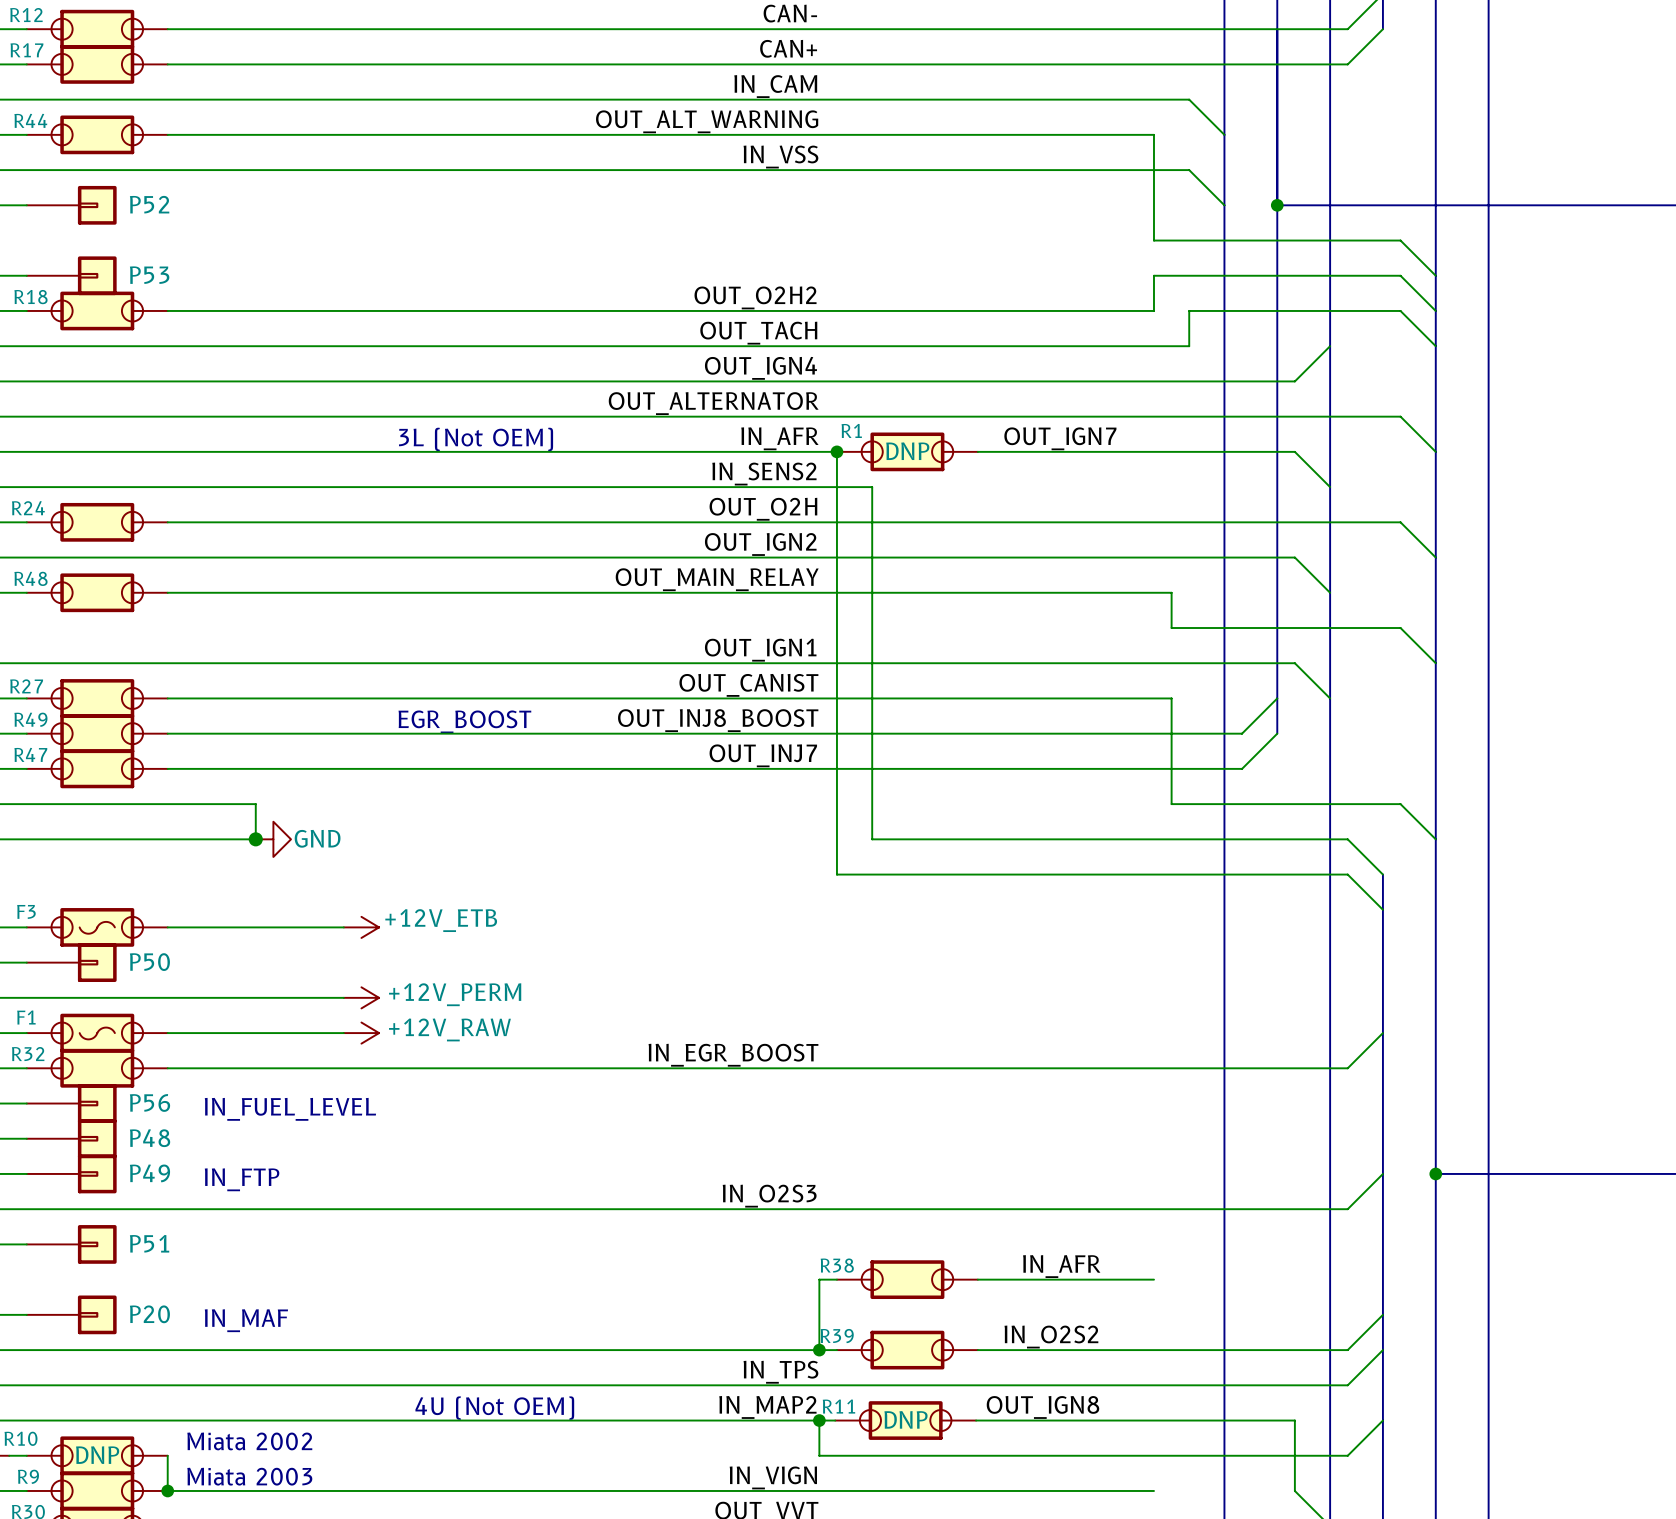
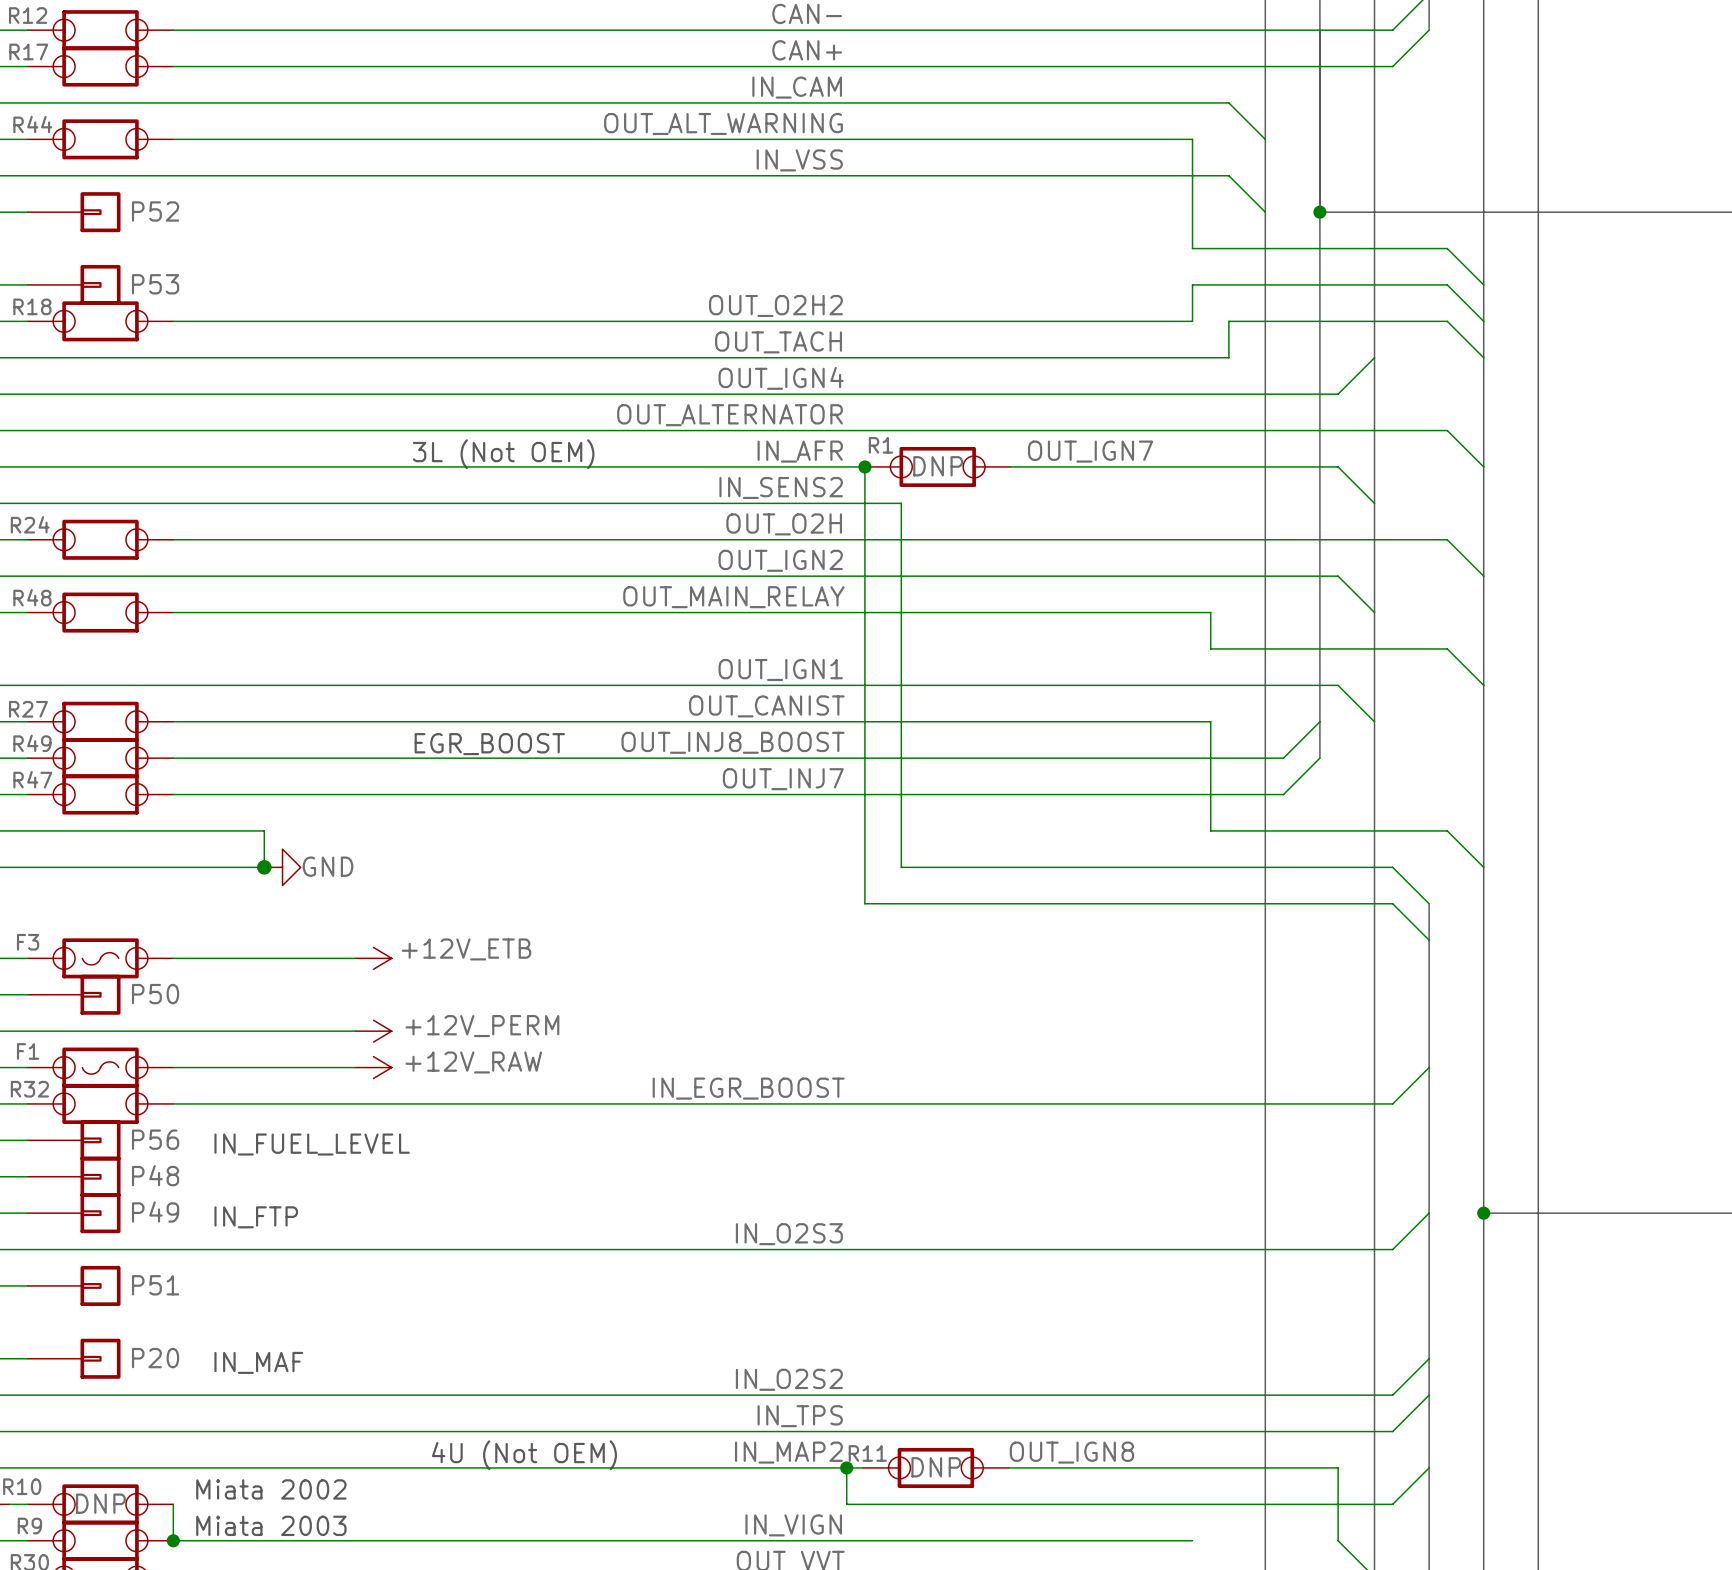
label: IN_AFR (1061, 1266) -> none
wire: (836, 1279) (819, 1279) (819, 1350) -> none
R38: (907, 1279) -> none
wire: (977, 1279) (1153, 1279) -> none
label position: IN_O2S2 (1051, 1337) -> IN_O2S2 (789, 1379)
junction: (819, 1350) -> none
R39: (907, 1350) -> none

